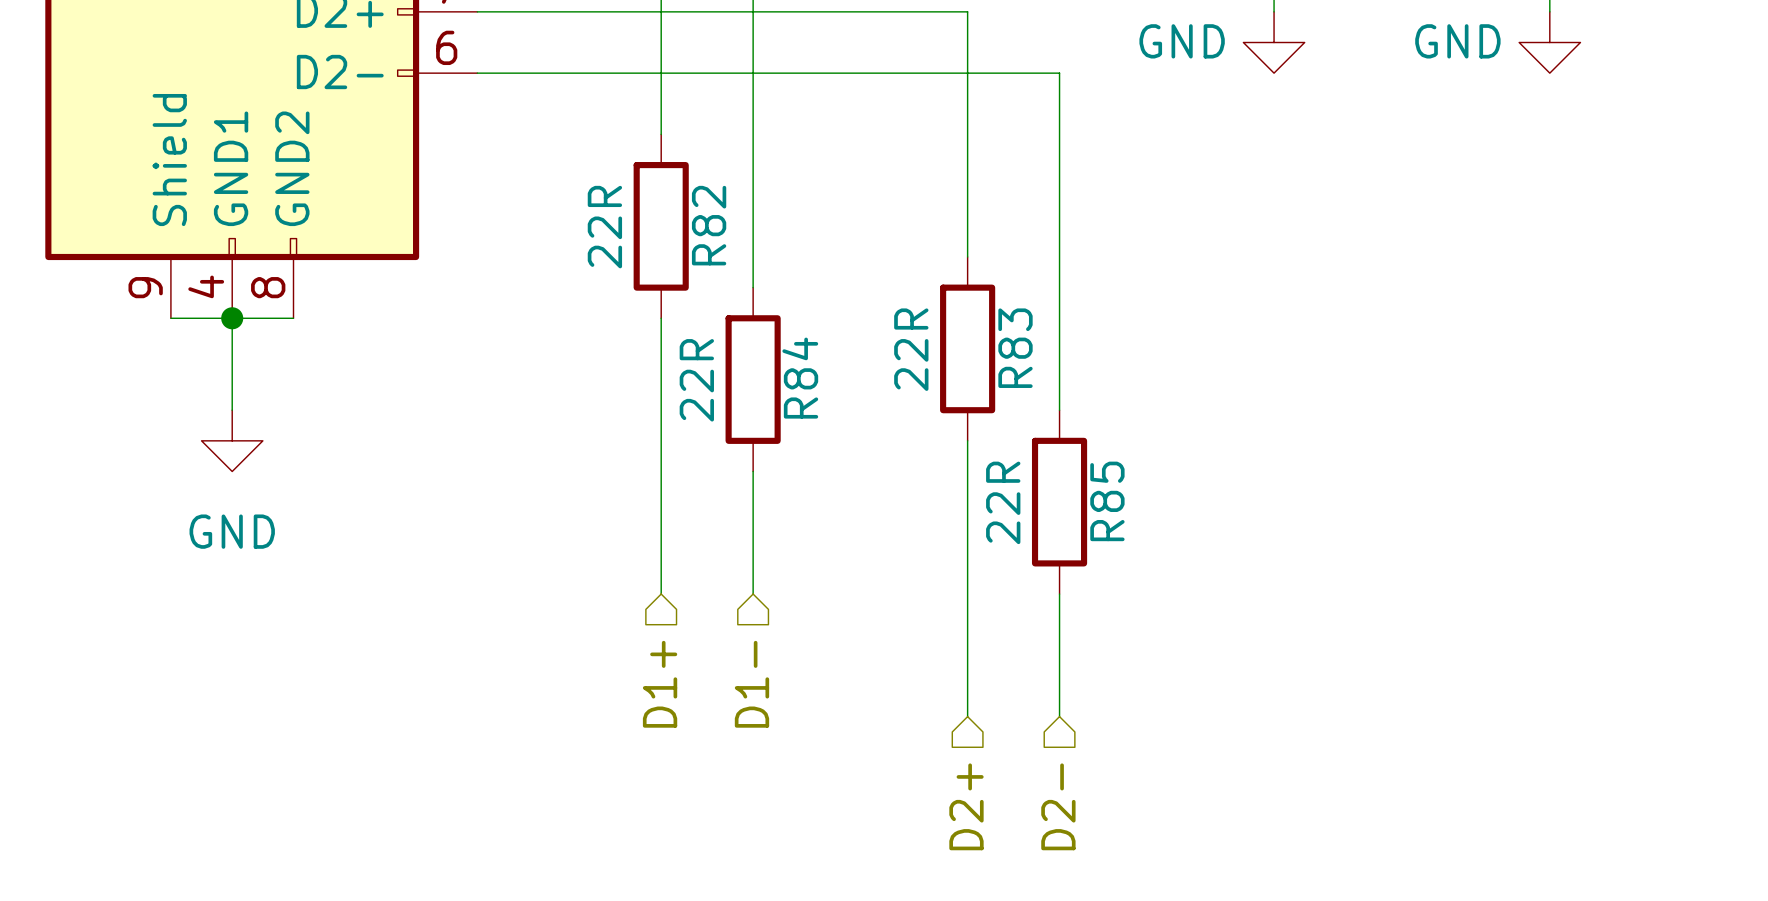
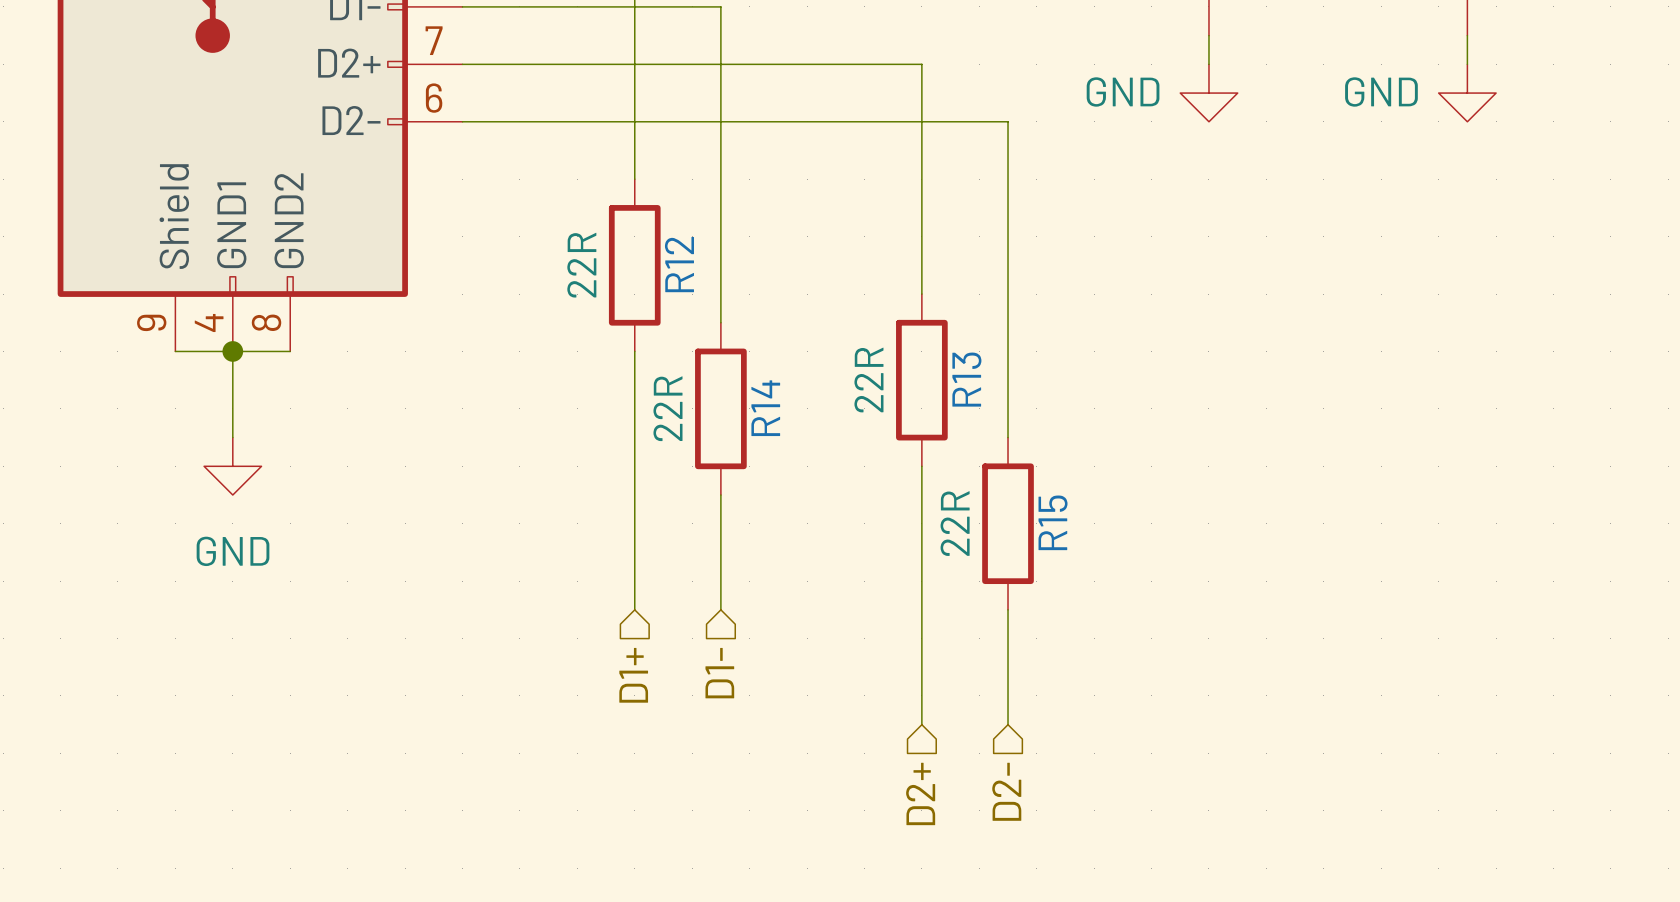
R82 name: R82 (709, 225) -> R12 (679, 264)
R83 name: R83 (1015, 348) -> R13 (966, 379)
R84 name: R84 (800, 378) -> R14 (765, 408)
R85 name: R85 (1107, 501) -> R15 (1053, 522)

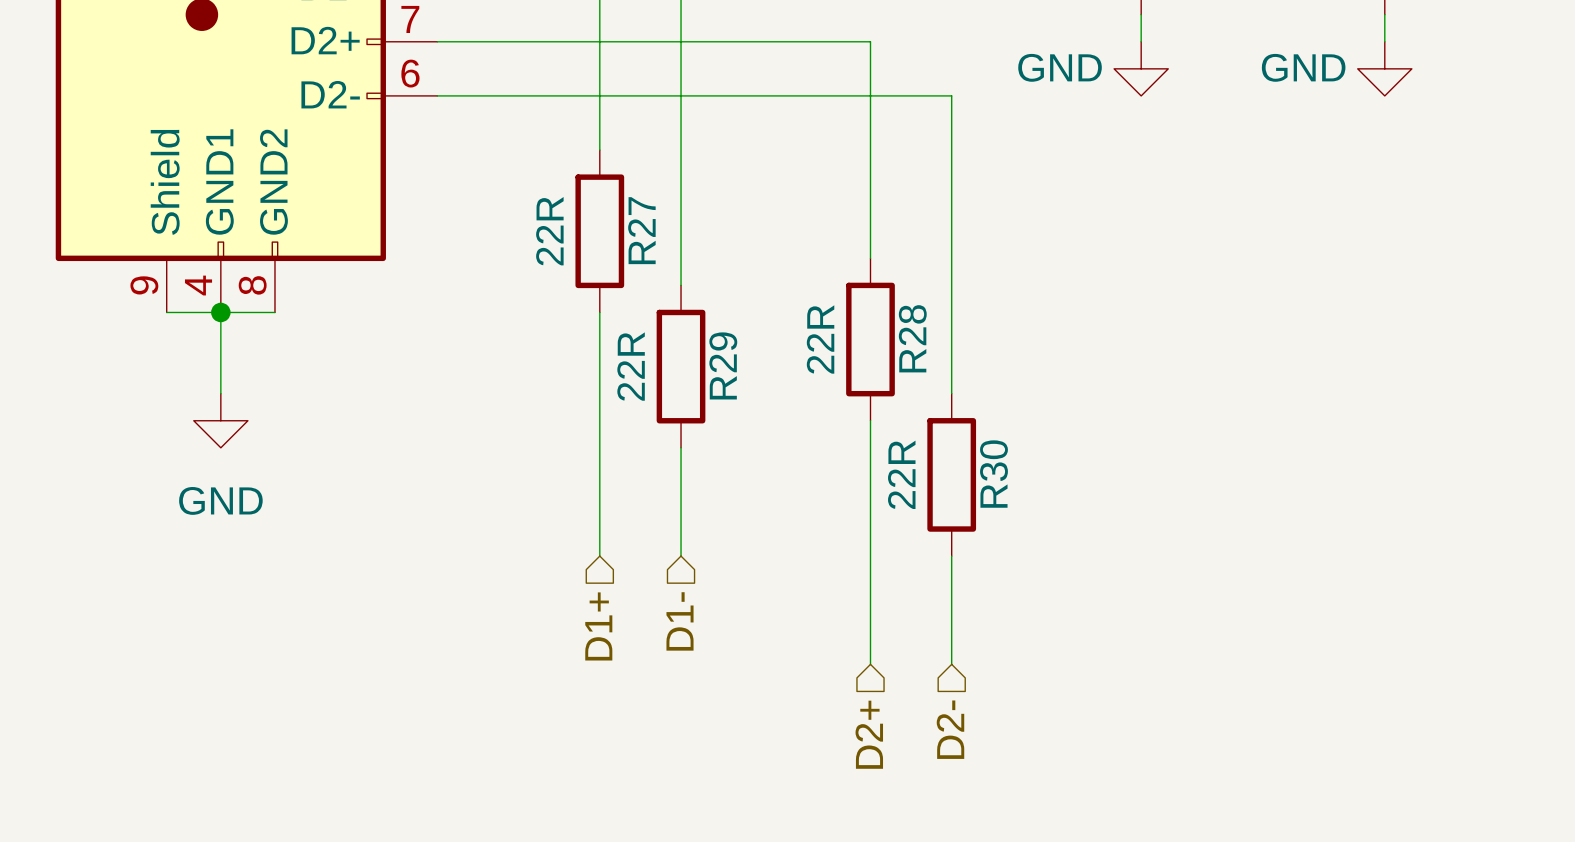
R12 name: R12 (679, 264) -> R27 (641, 230)
R13 name: R13 (966, 379) -> R28 (912, 338)
R14 name: R14 (765, 408) -> R29 (723, 365)
R15 name: R15 (1053, 522) -> R30 (993, 474)

